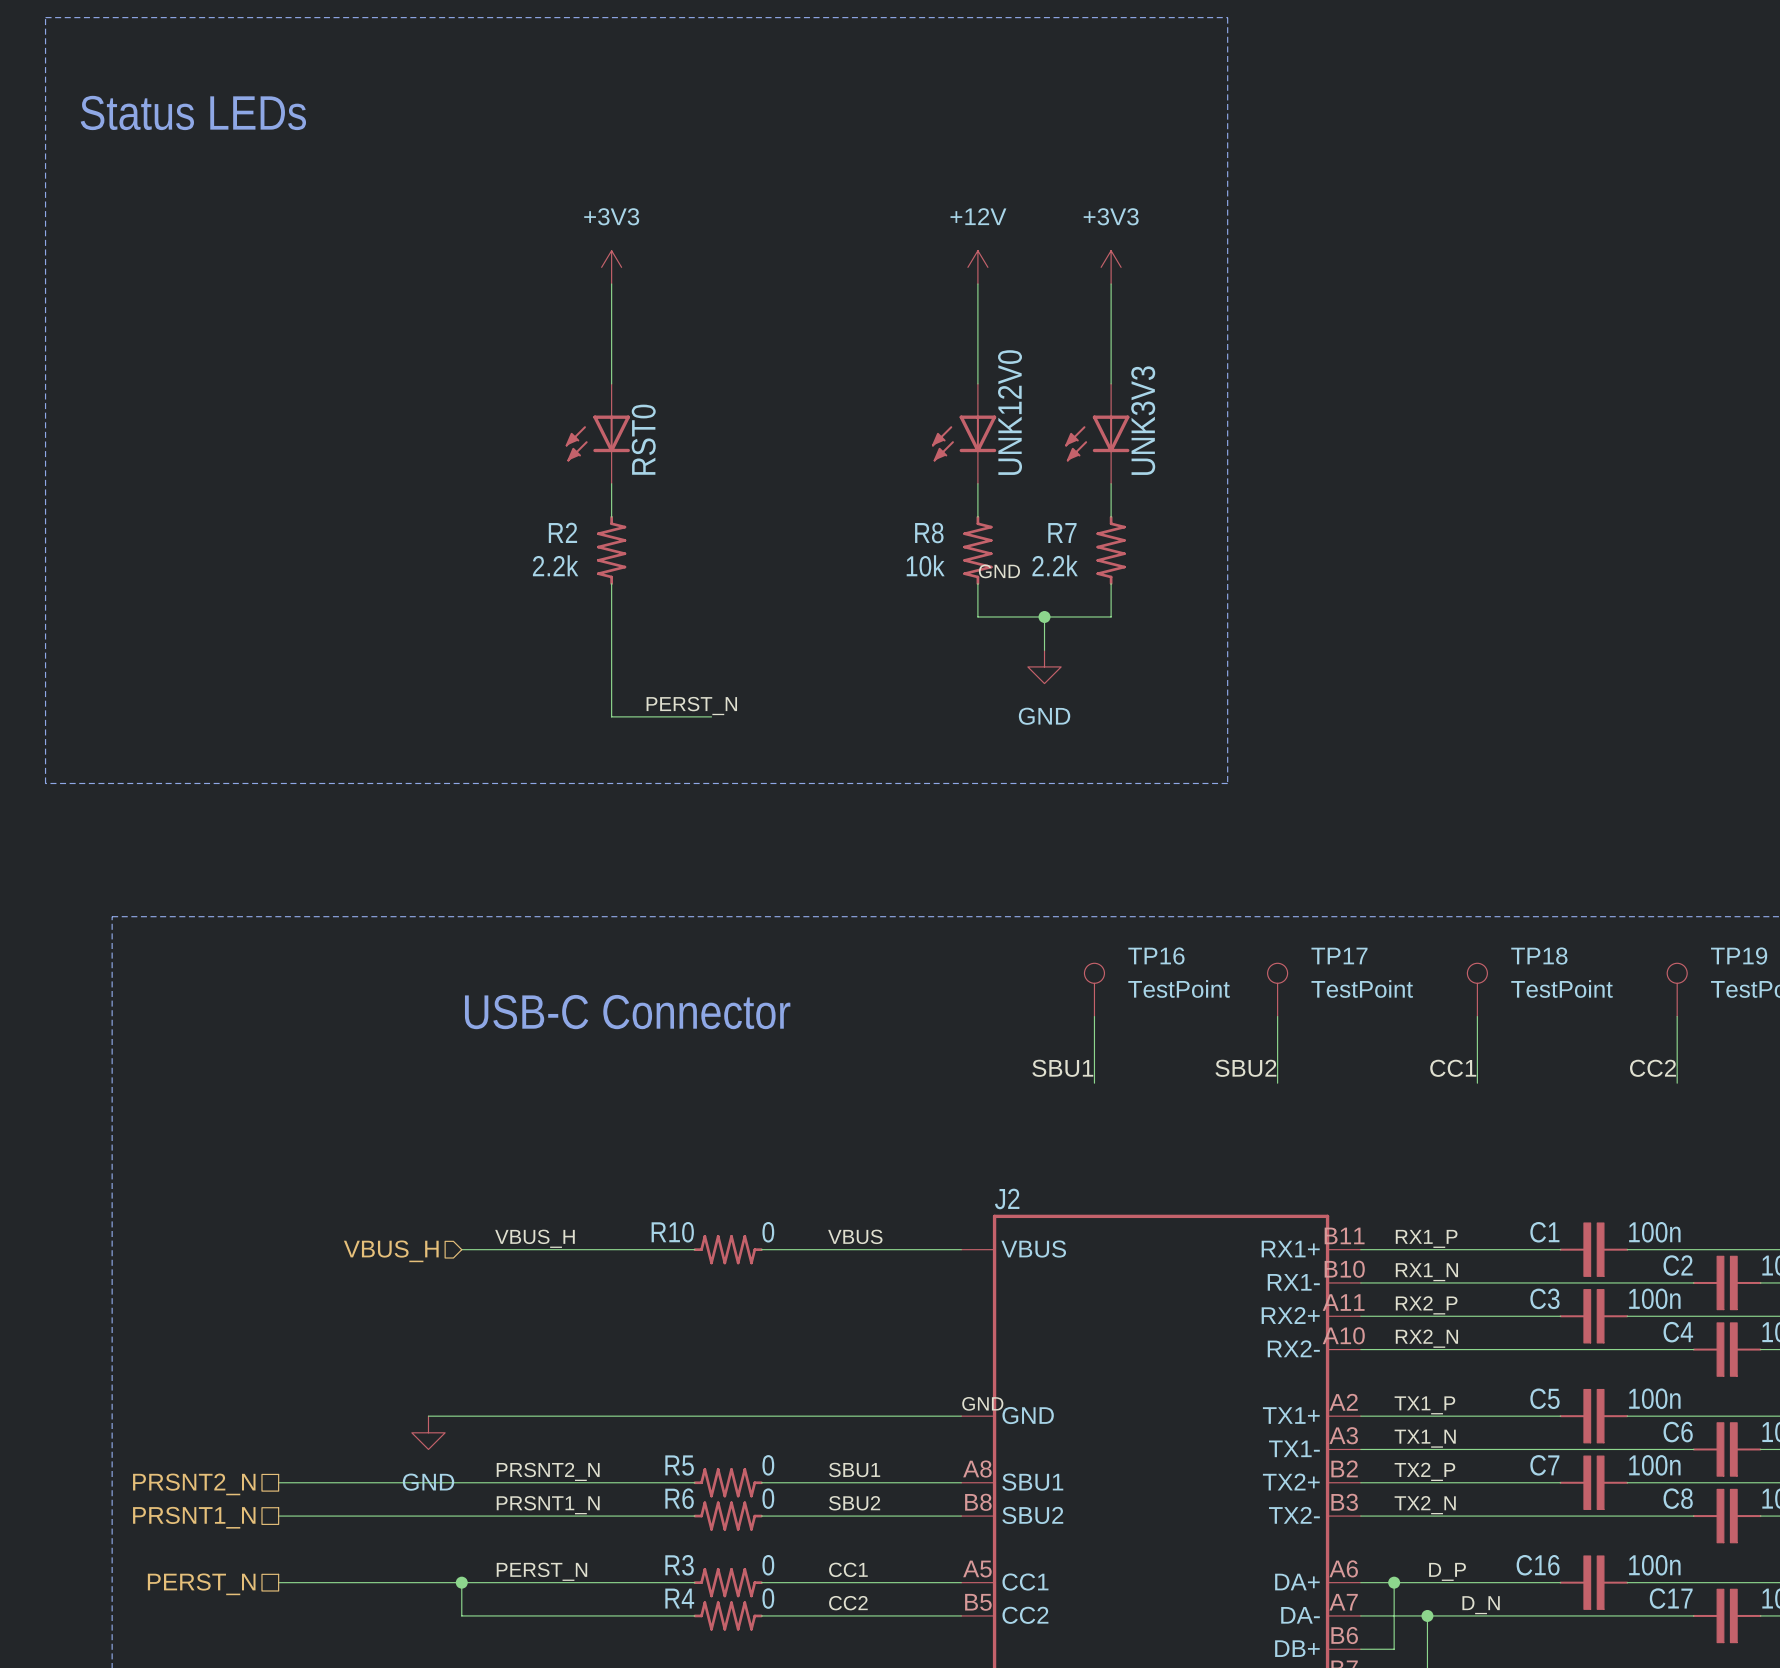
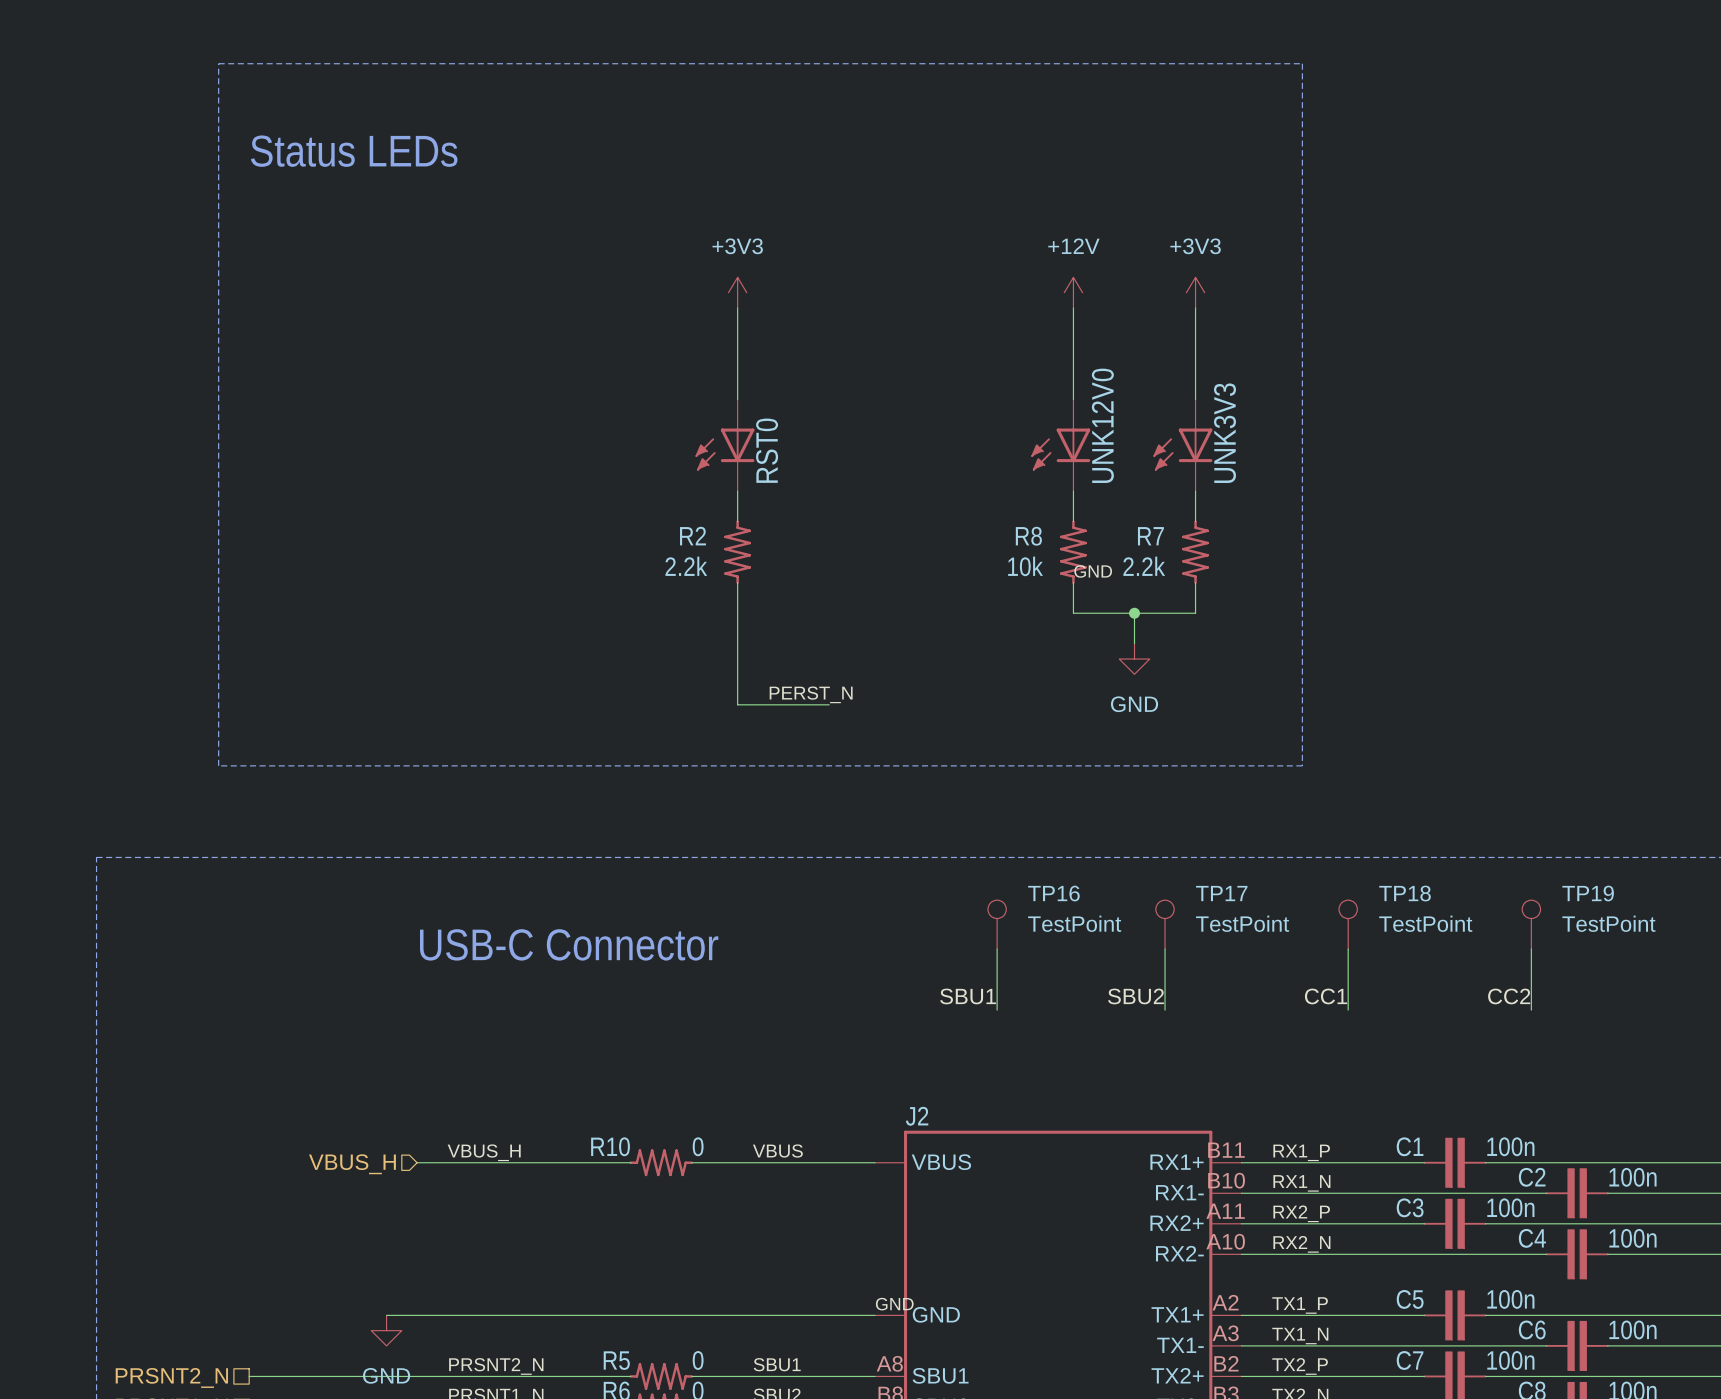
line: (45, 17) (1227, 17) (1227, 783) (45, 783) (45, 17) -> (218, 63) (1302, 63) (1302, 765) (218, 765) (218, 63)
text position: Status LEDs (193, 112) -> Status LEDs (354, 151)
power symbol: +3V3 (611, 267) -> none
power symbol position: +12V (977, 267) -> +12V (1073, 292)
power symbol: +3V3 (1111, 267) -> none
wire: (611, 284) (611, 383) -> (737, 307) (737, 399)
wire: (977, 284) (977, 383) -> (1073, 307) (1073, 399)
wire: (1111, 284) (1111, 383) -> (1195, 307) (1195, 399)
power symbol: none -> +3V3 (737, 292)
power symbol: none -> +3V3 (1195, 292)
RST0 position: (597, 433) -> (724, 445)
UNK12V0 position: (964, 433) -> (1060, 445)
UNK3V3 position: (1097, 433) -> (1182, 445)
wire: (611, 483) (611, 517) -> (737, 491) (737, 521)
wire: (977, 483) (977, 517) -> (1073, 491) (1073, 521)
wire: (1111, 483) (1111, 517) -> (1195, 491) (1195, 521)
R2 position: (611, 550) -> (737, 552)
R8 position: (977, 550) -> (1073, 552)
R7 position: (1111, 550) -> (1195, 552)
label position: GND (999, 571) -> GND (1093, 571)
wire: (611, 583) (611, 716) (711, 716) -> (737, 582) (737, 704) (829, 704)
wire: (977, 583) (977, 616) (1111, 616) (1111, 583) -> (1073, 582) (1073, 613) (1195, 613) (1195, 582)
wire: (1044, 616) (1044, 650) -> (1134, 613) (1134, 643)
junction: (1044, 616) -> none
junction: none -> (1134, 613)
power symbol position: GND (1044, 666) -> GND (1134, 659)
label position: PERST_N (691, 706) -> PERST_N (811, 694)

